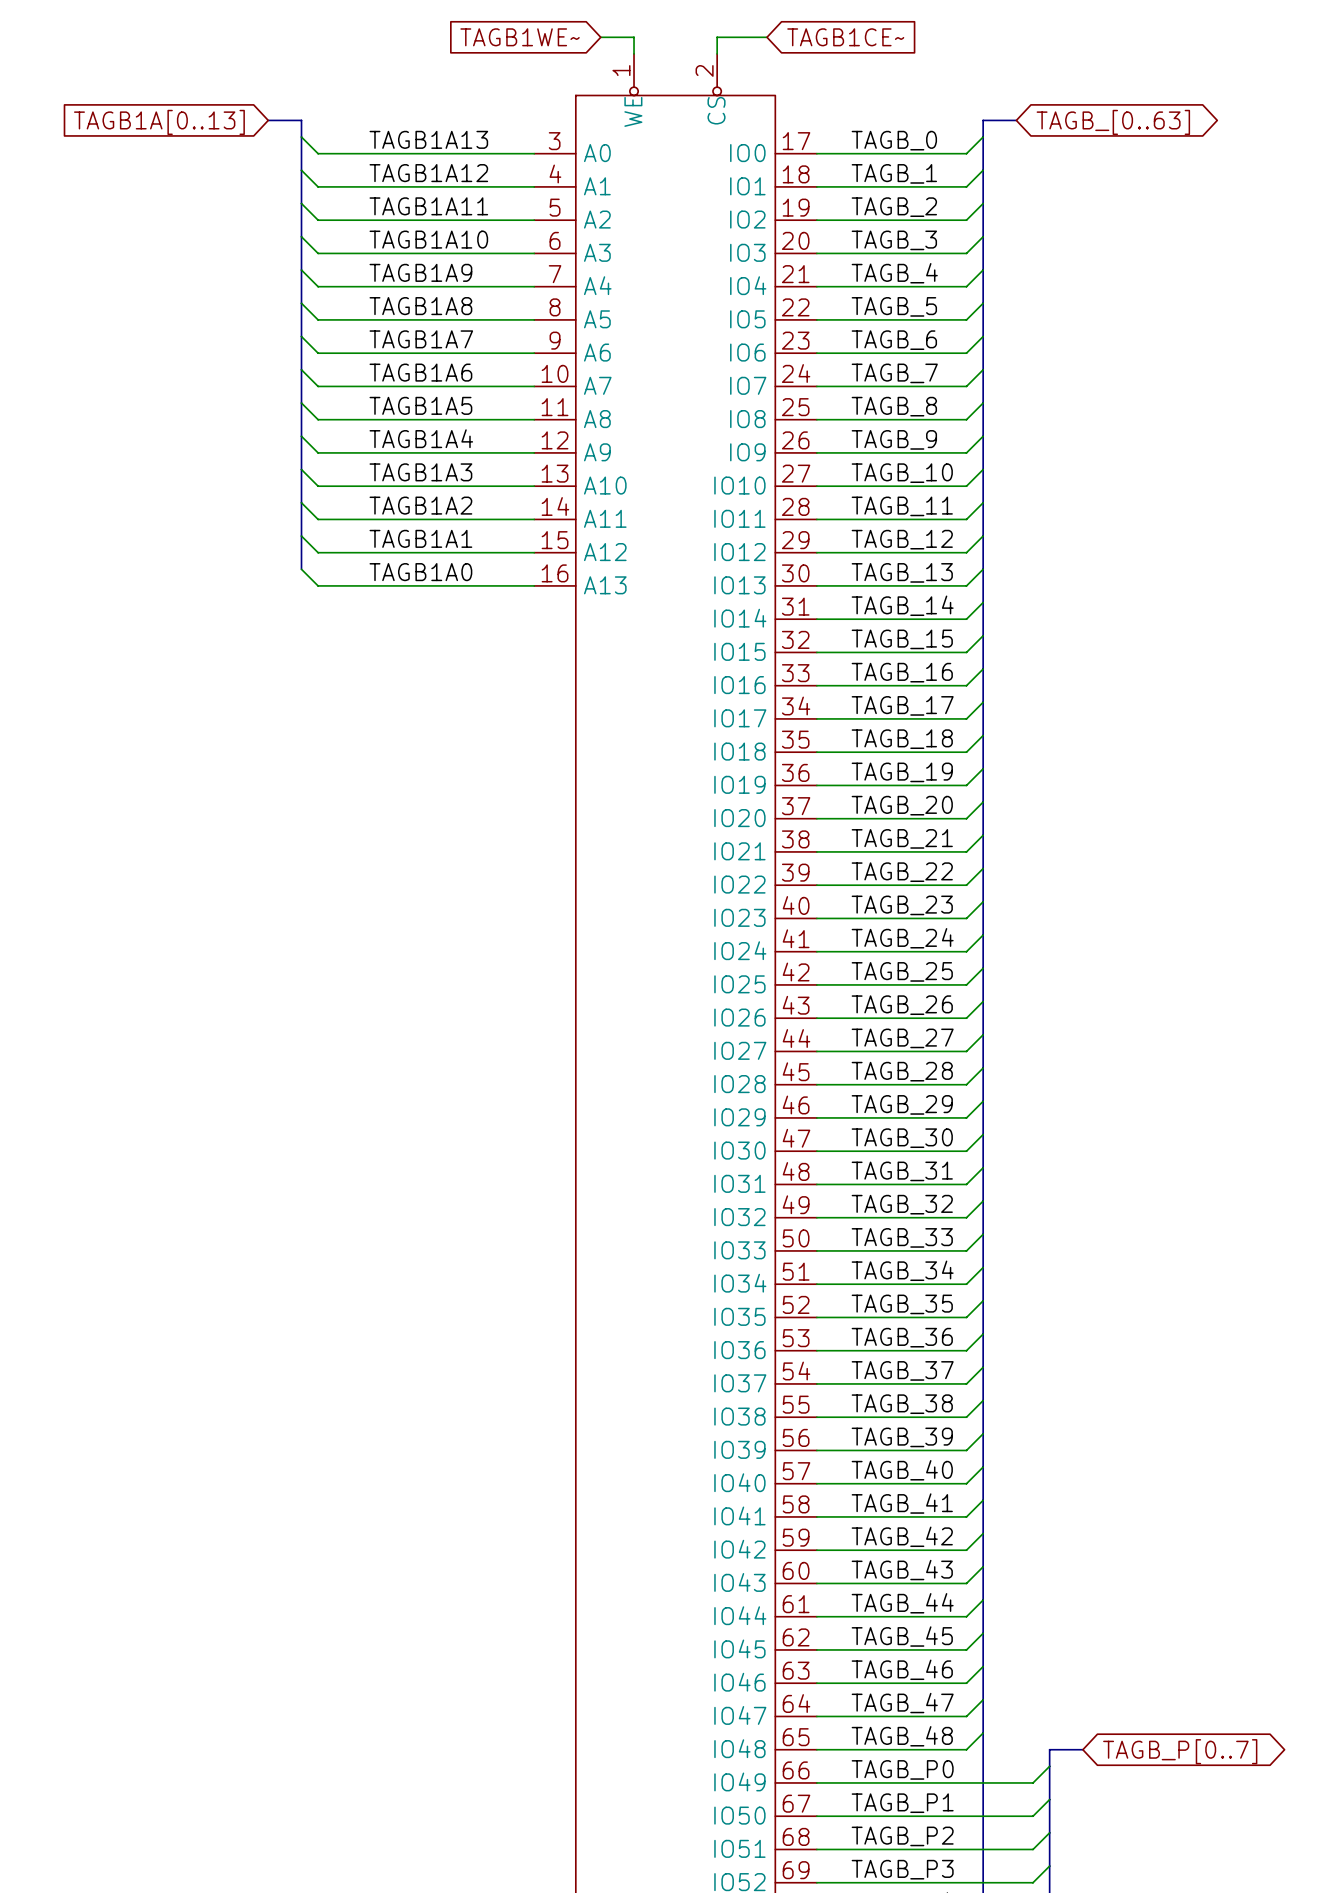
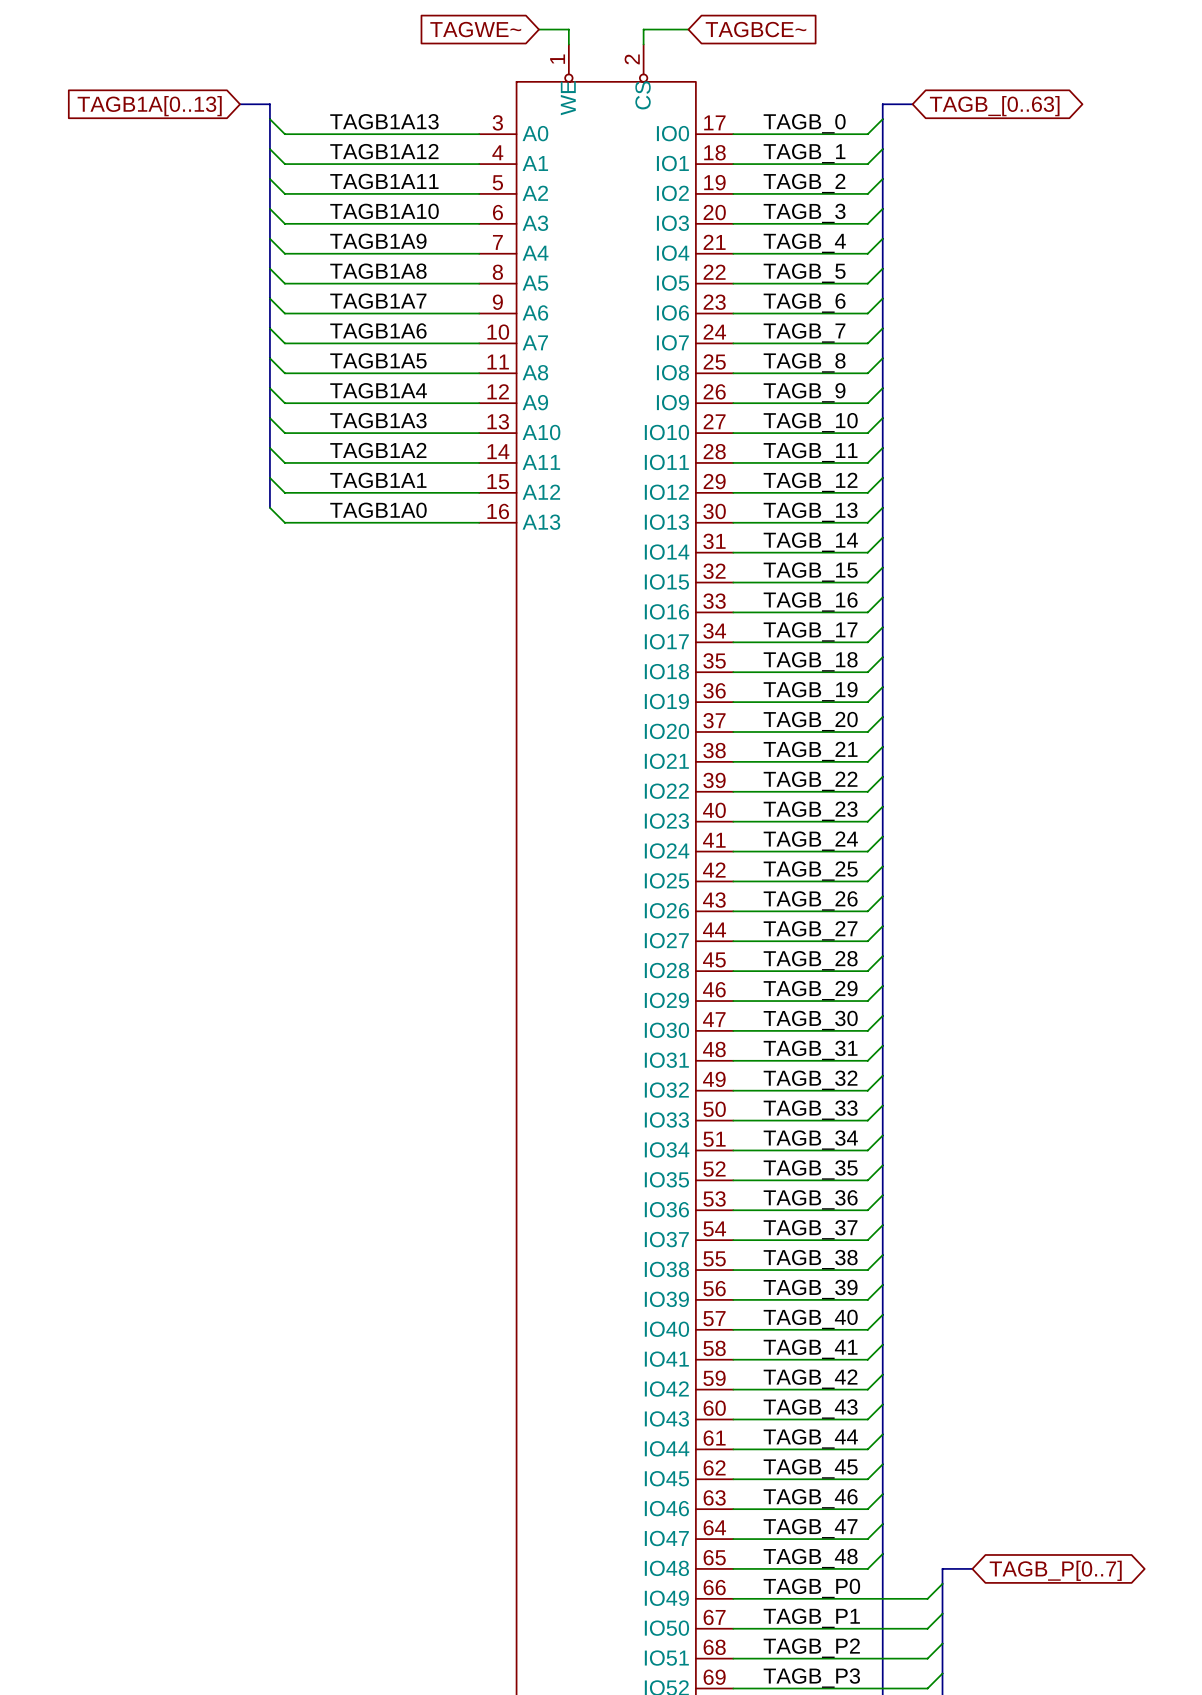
global label: TAGB1WE~ (520, 37) -> TAGWE~ (475, 29)
global label: TAGB1CE~ (845, 37) -> TAGBCE~ (756, 29)

